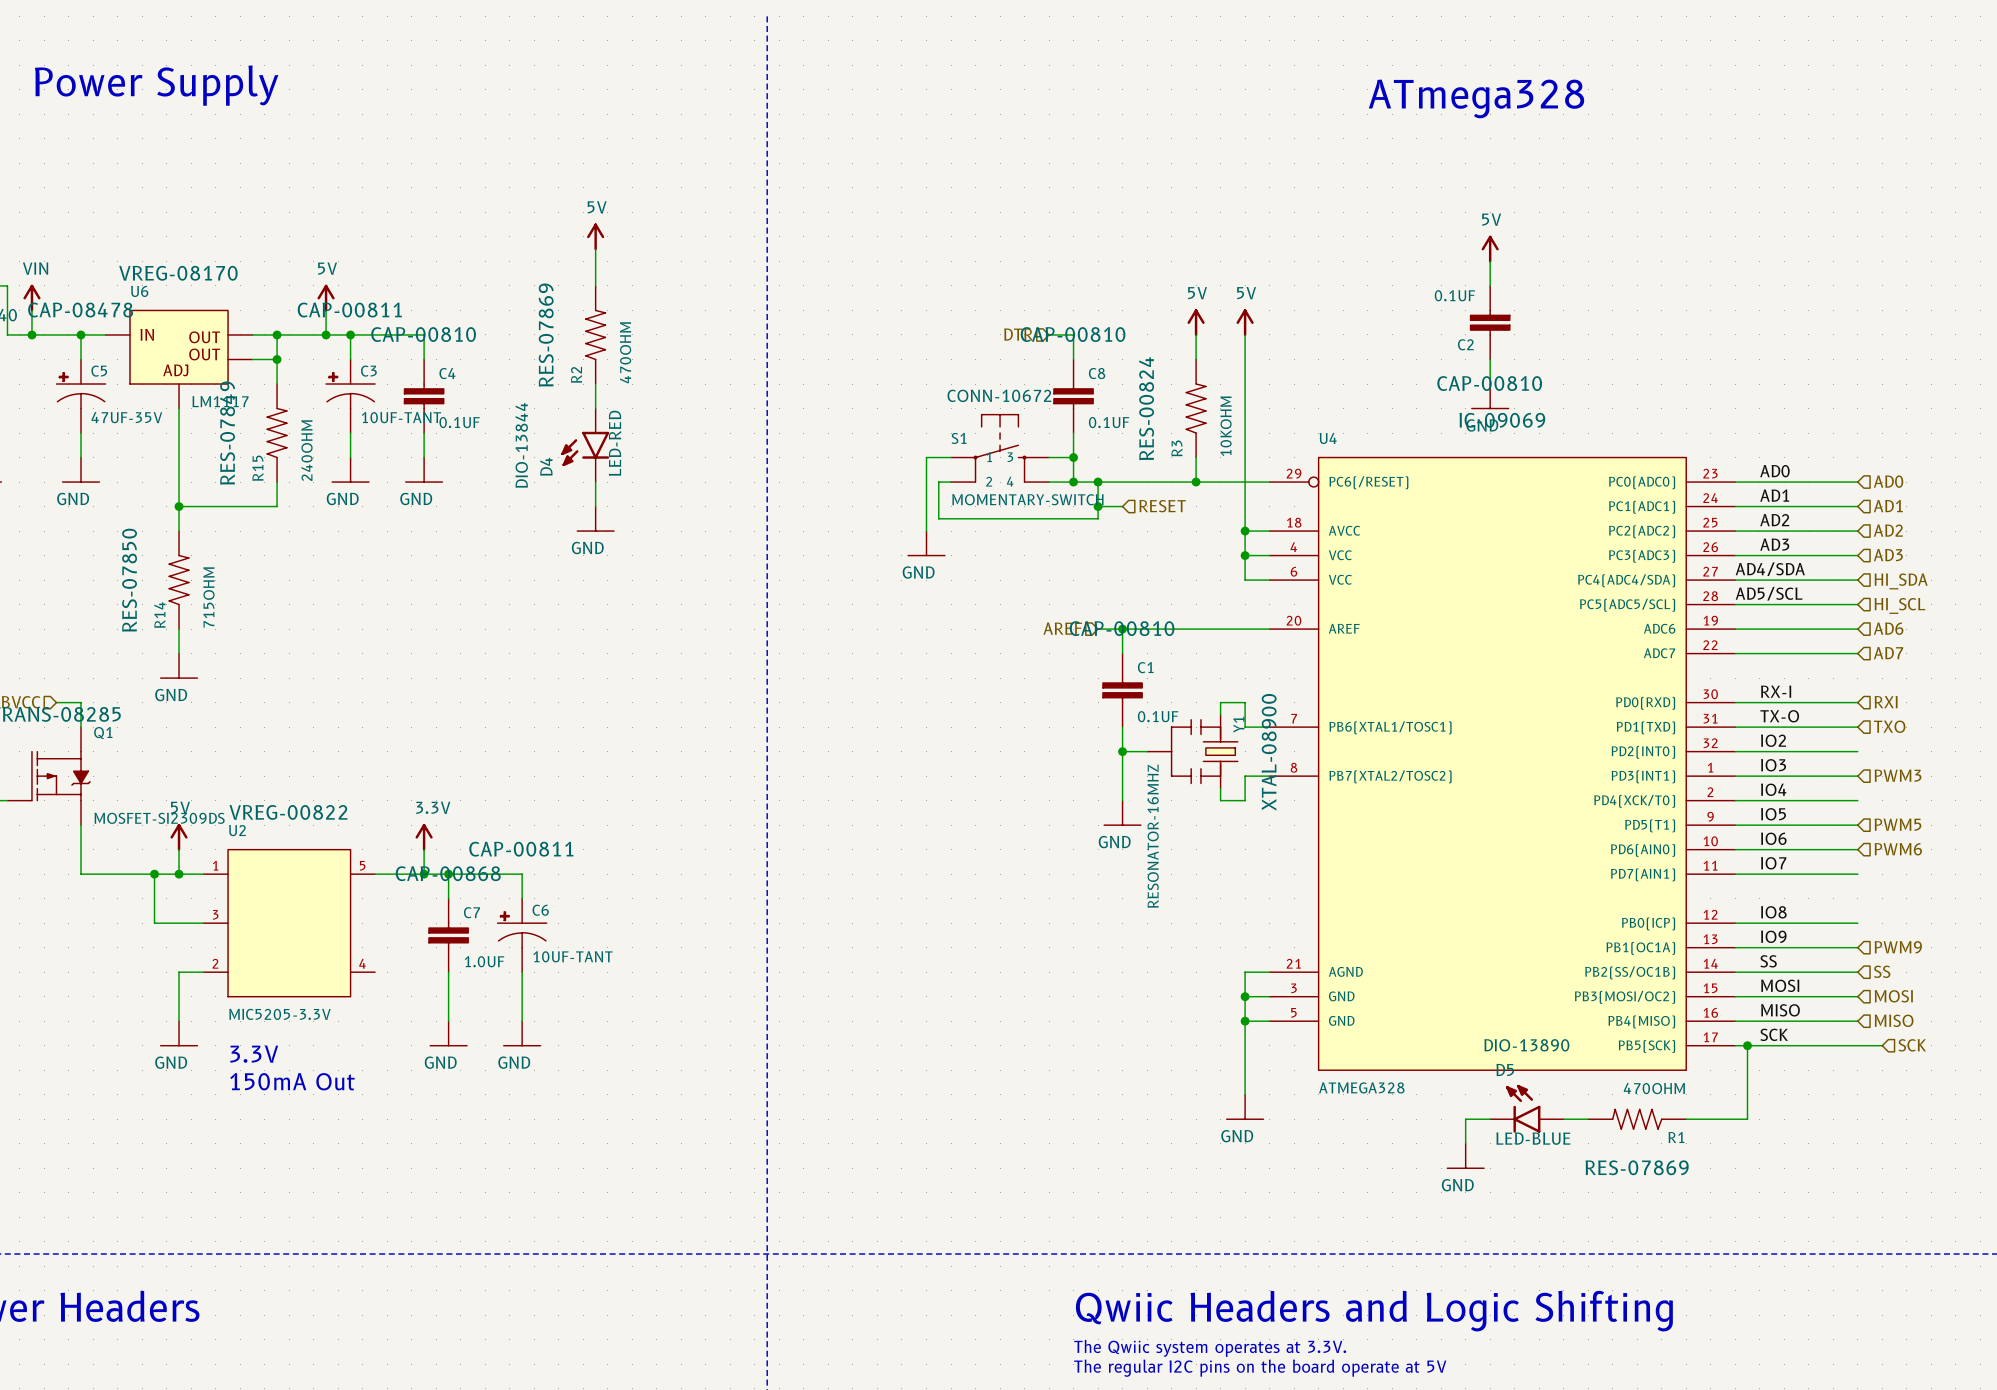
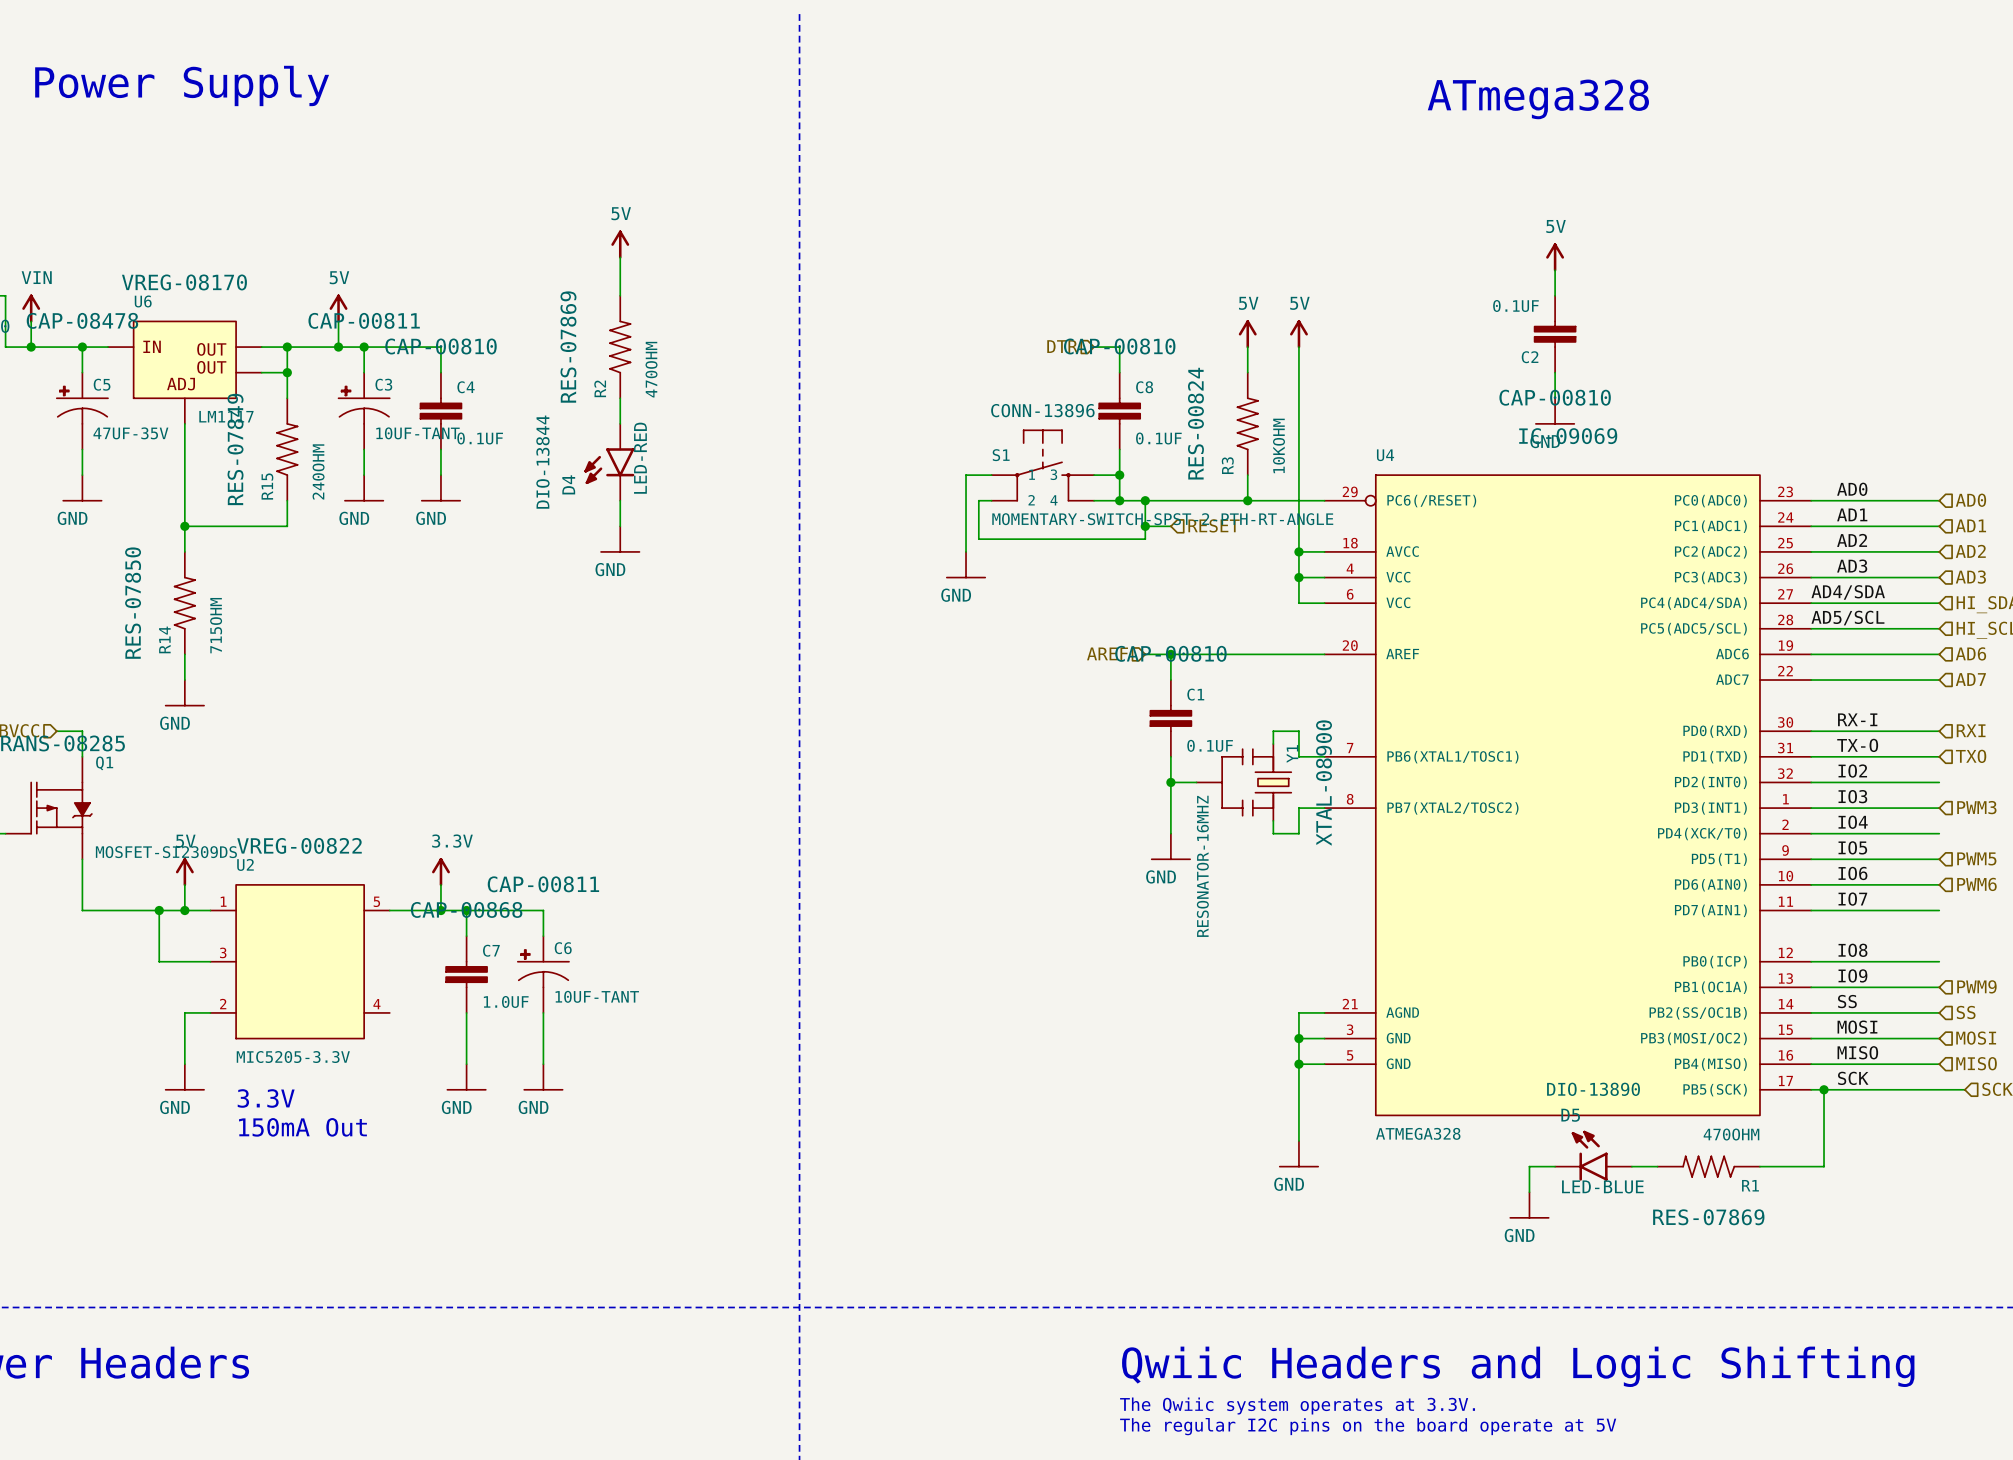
S1 text: CONN-10672 (999, 395) -> CONN-13896 (1042, 410)
S1 value: MOMENTARY-SWITCH (1027, 499) -> MOMENTARY-SWITCH-SPST-2-PTH-RT-ANGLE (1162, 519)

